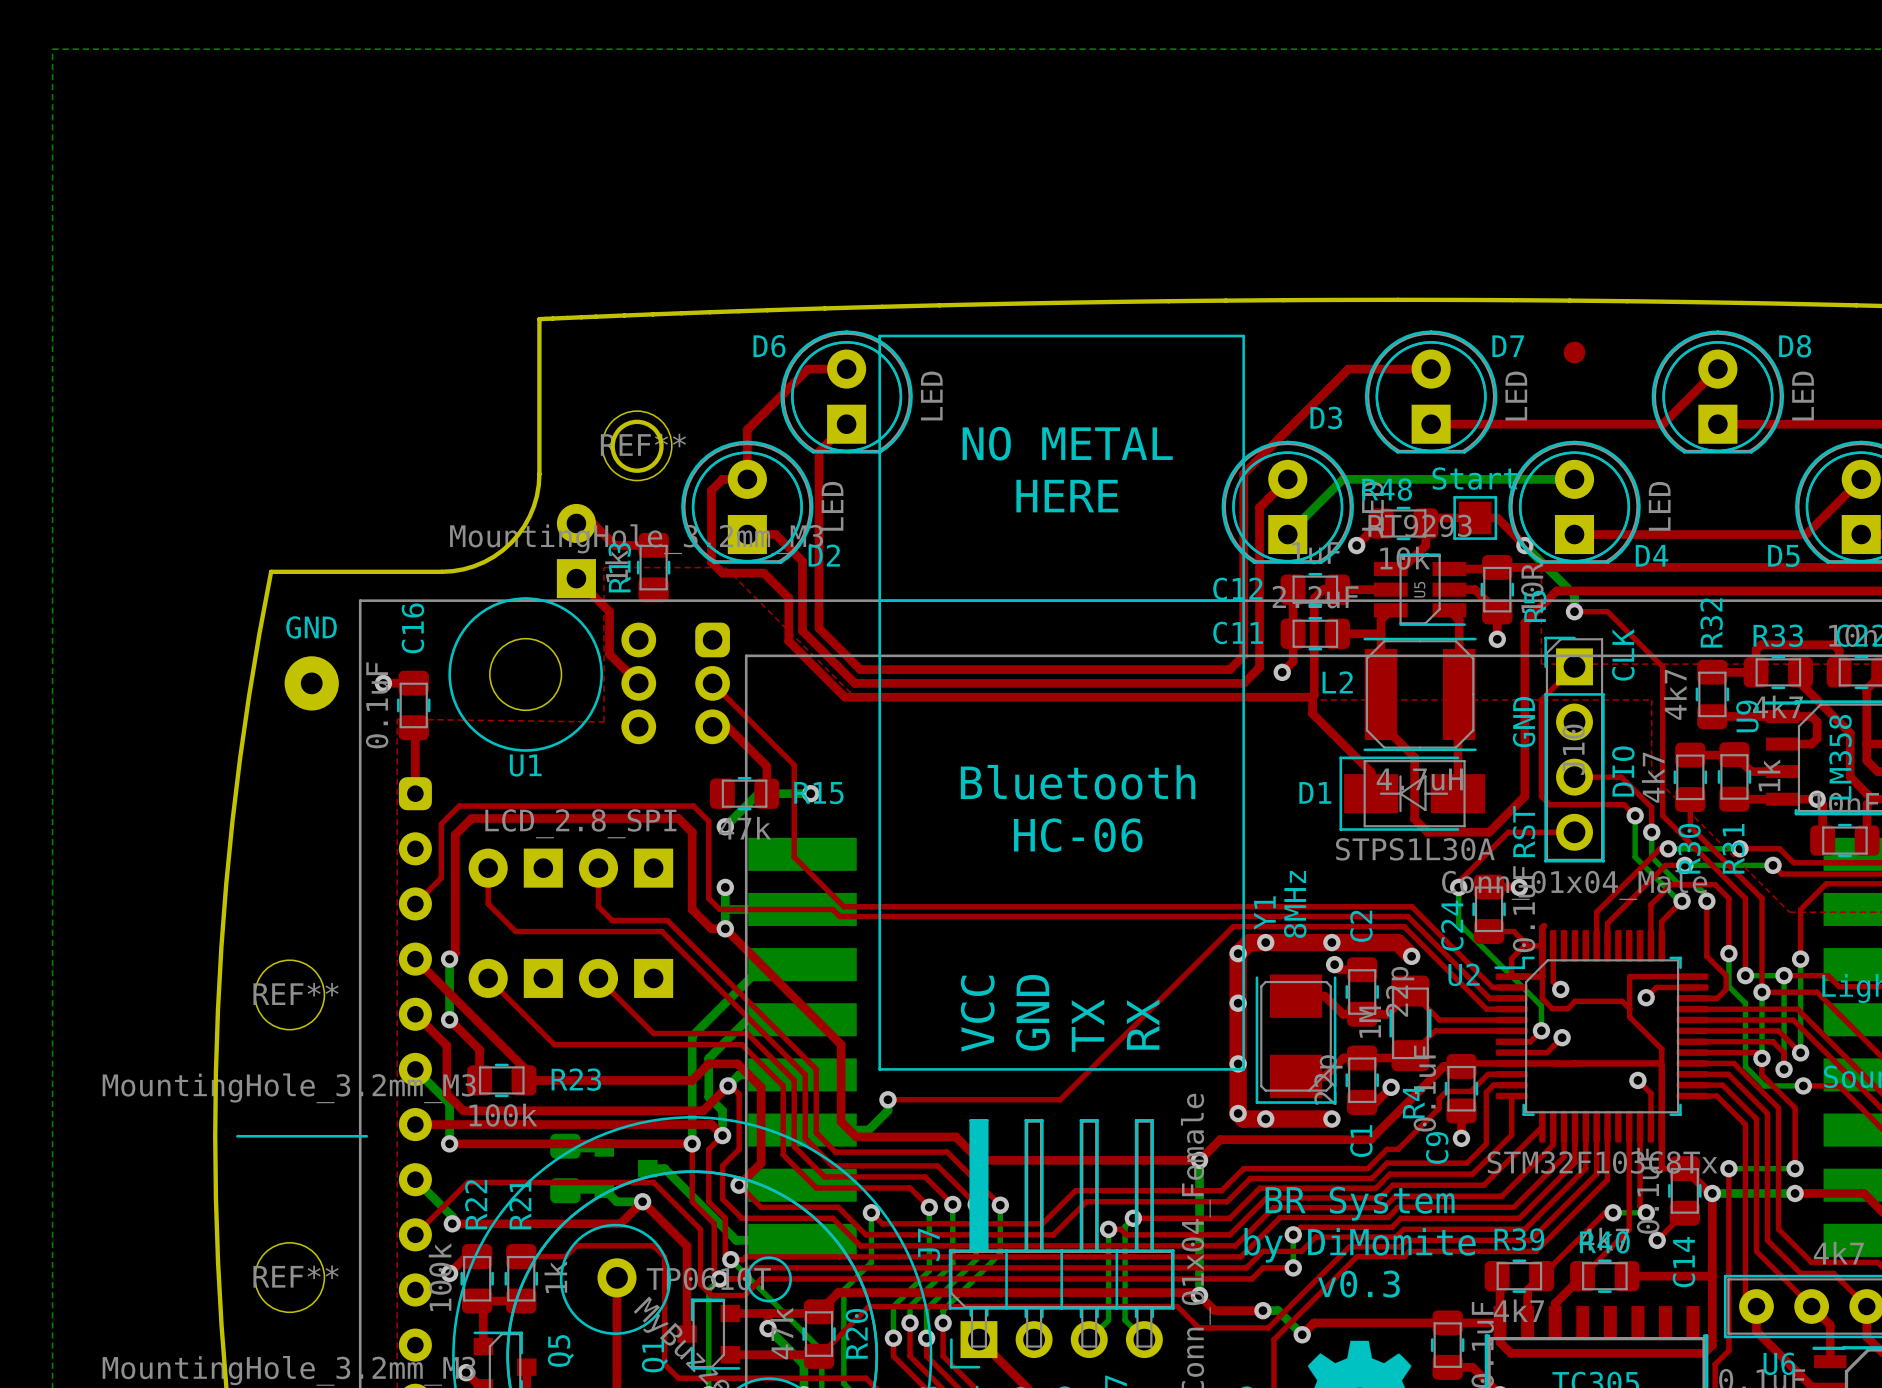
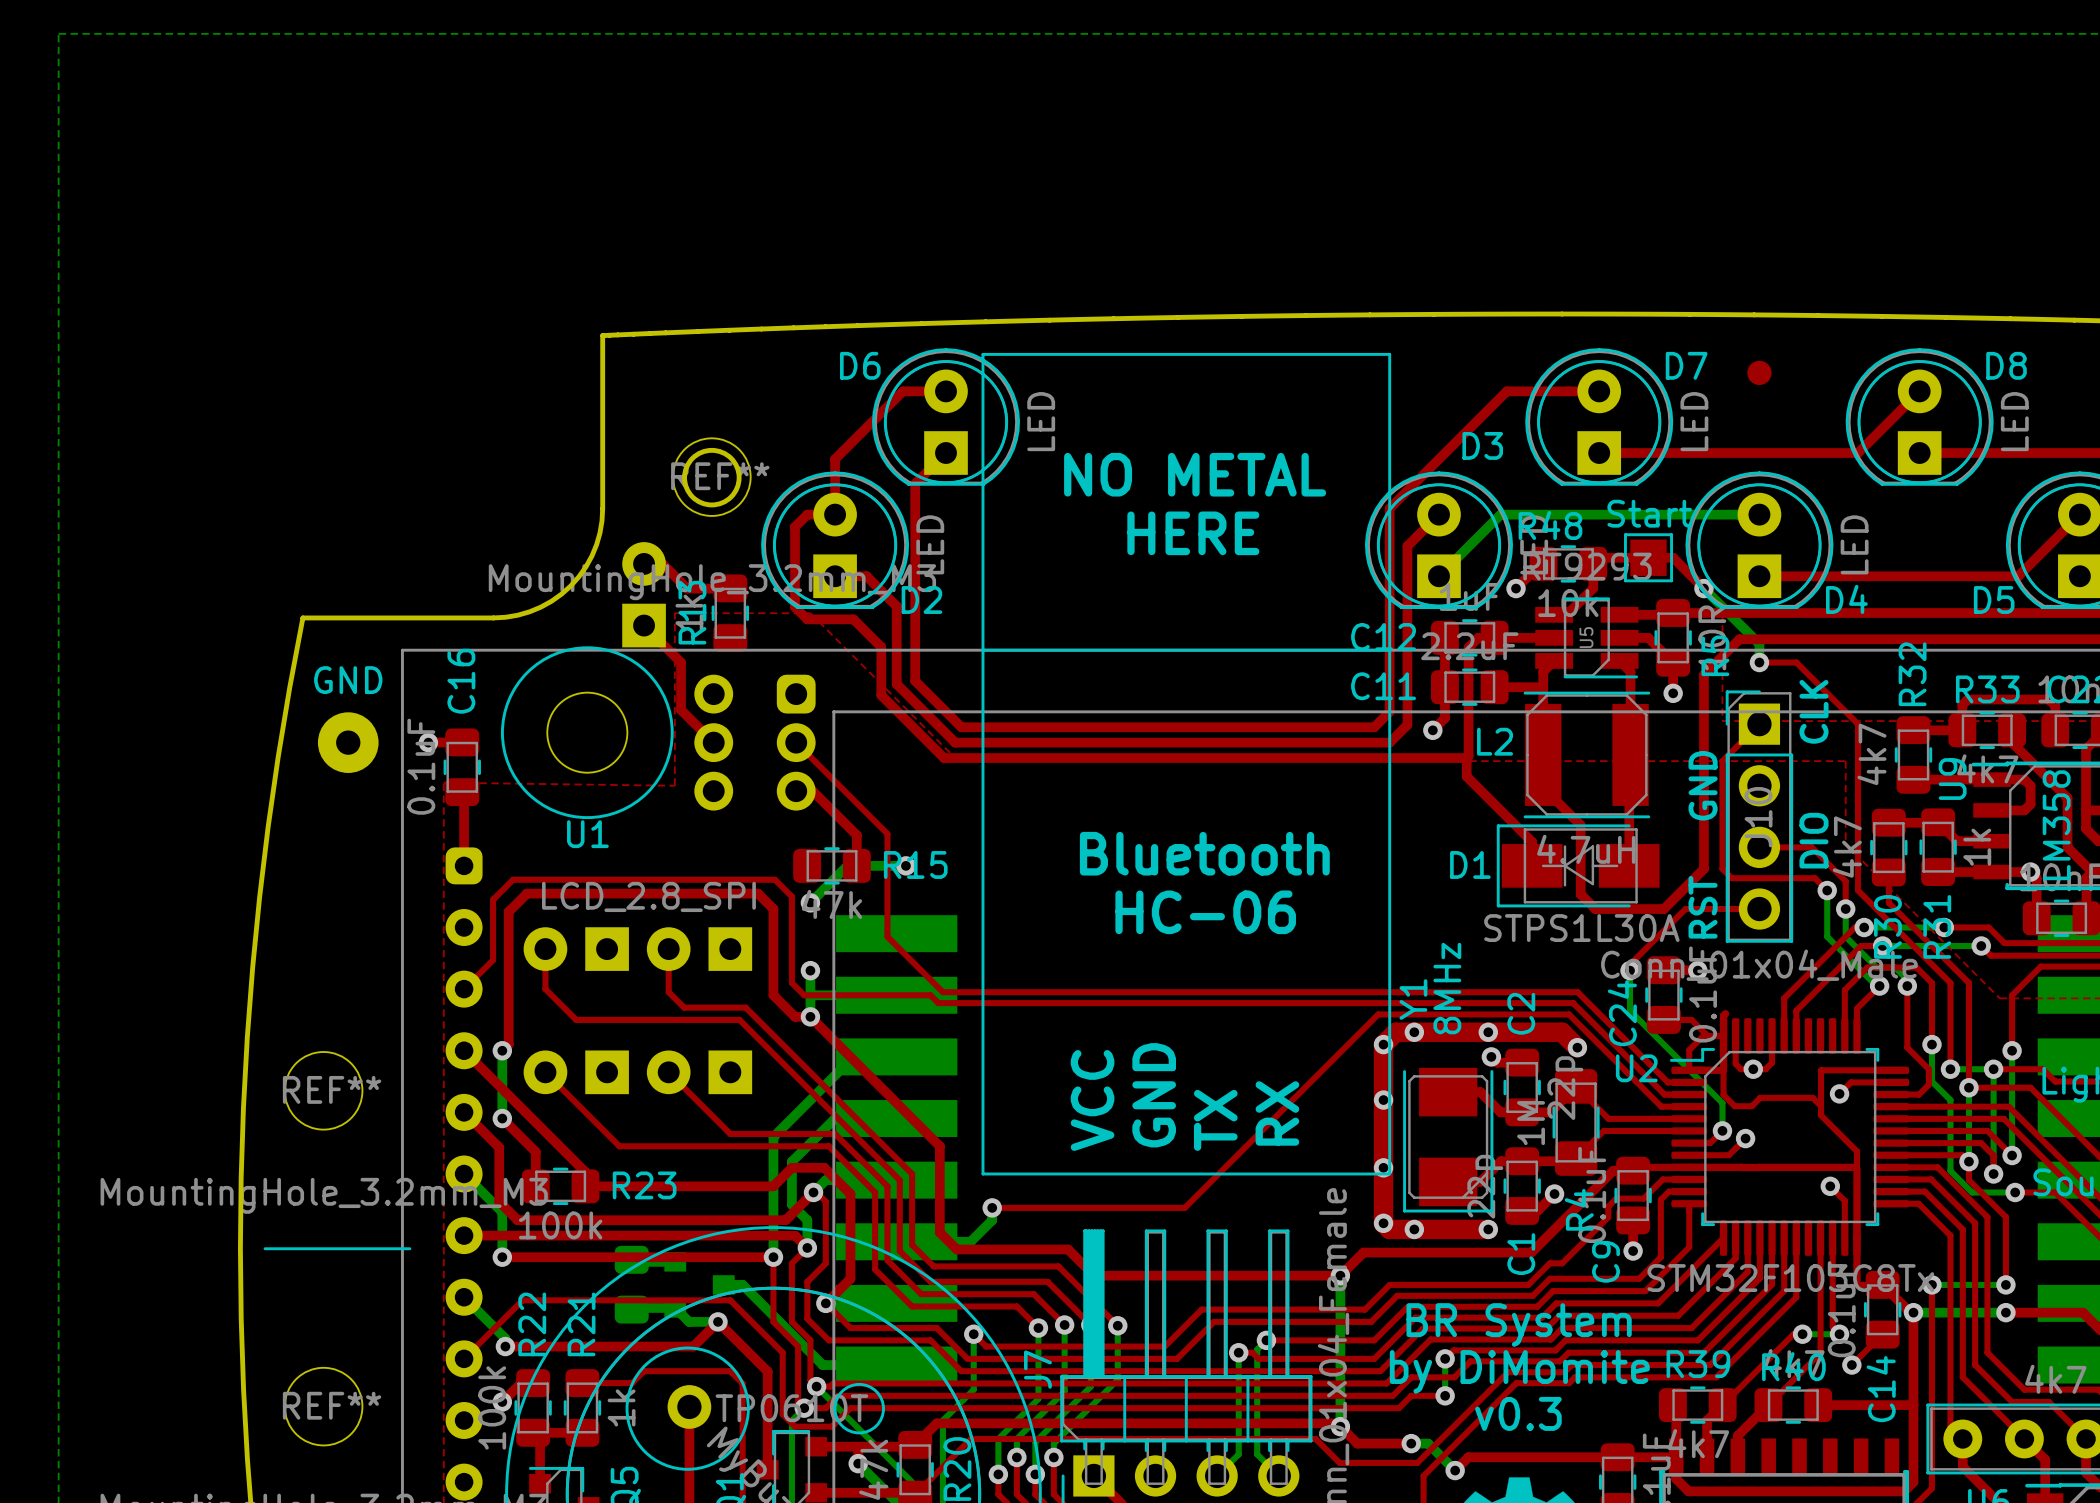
top track: (1553, 970) (1553, 981) (1560, 989) -> (1735, 1063) (1740, 1069) (1765, 1069) (1772, 1062) (1772, 1036)
via position: (1560, 989) -> (1753, 1069)

